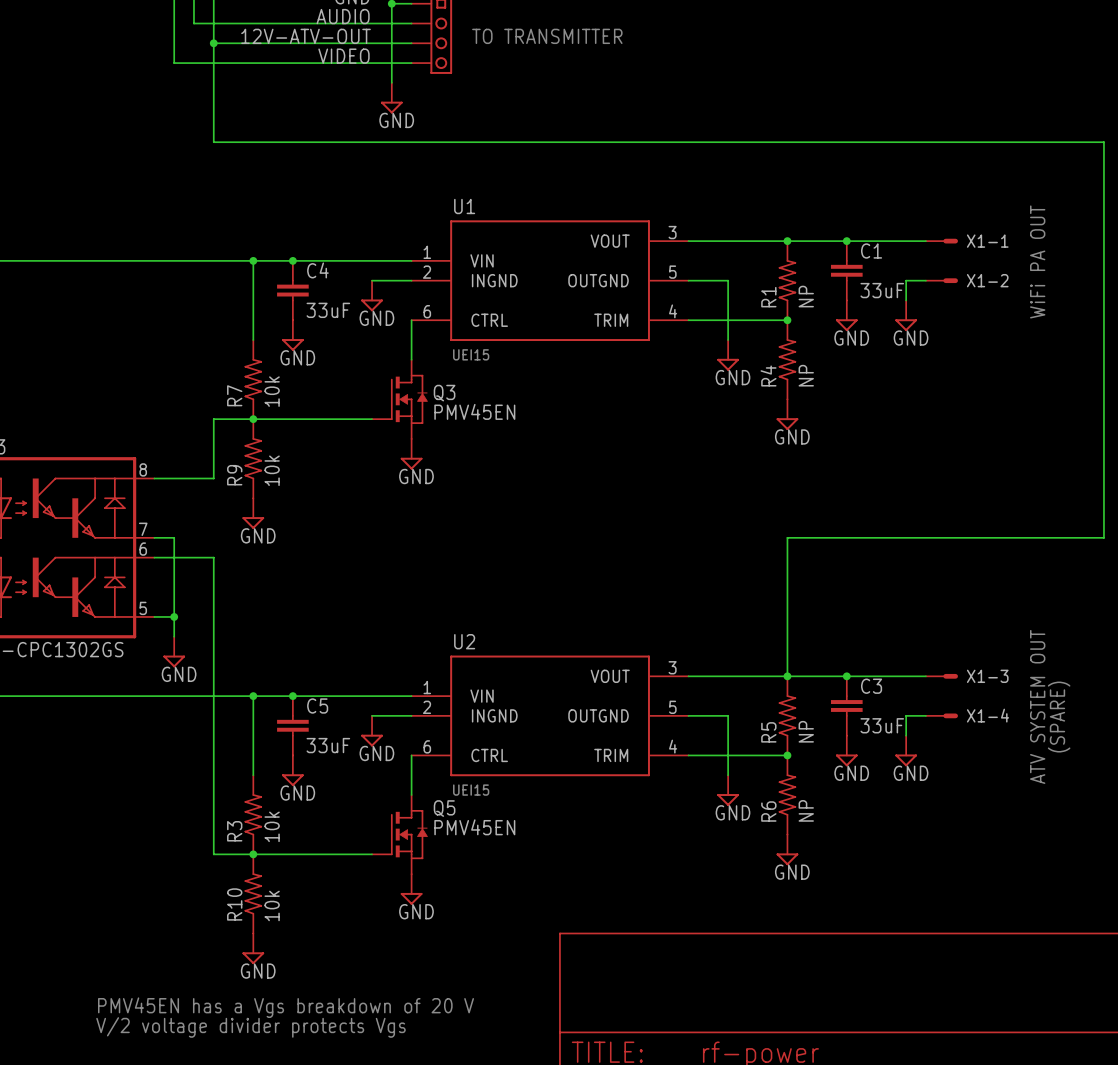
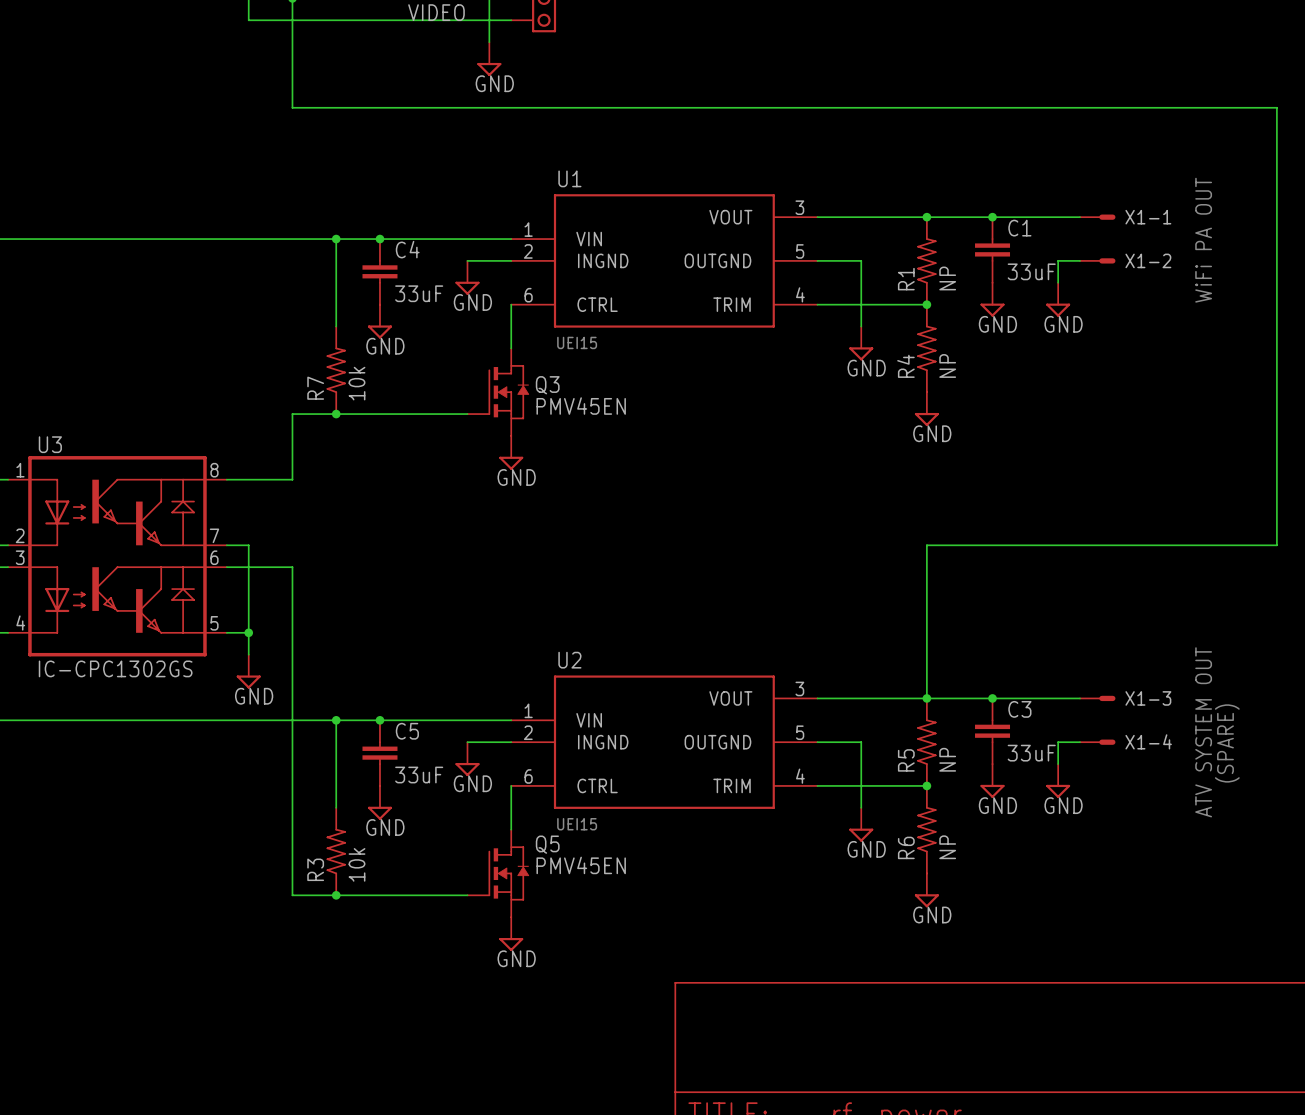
R9: 10k (253, 458) -> none
power symbol: GND (253, 513) -> none
R10: 10k (253, 893) -> none
power symbol: GND (253, 948) -> none
text: PMV45EN has a Vgs breakdown of 20 V (286, 1007) -> none
text: V/2 voltage divider protects Vgs (250, 1027) -> none

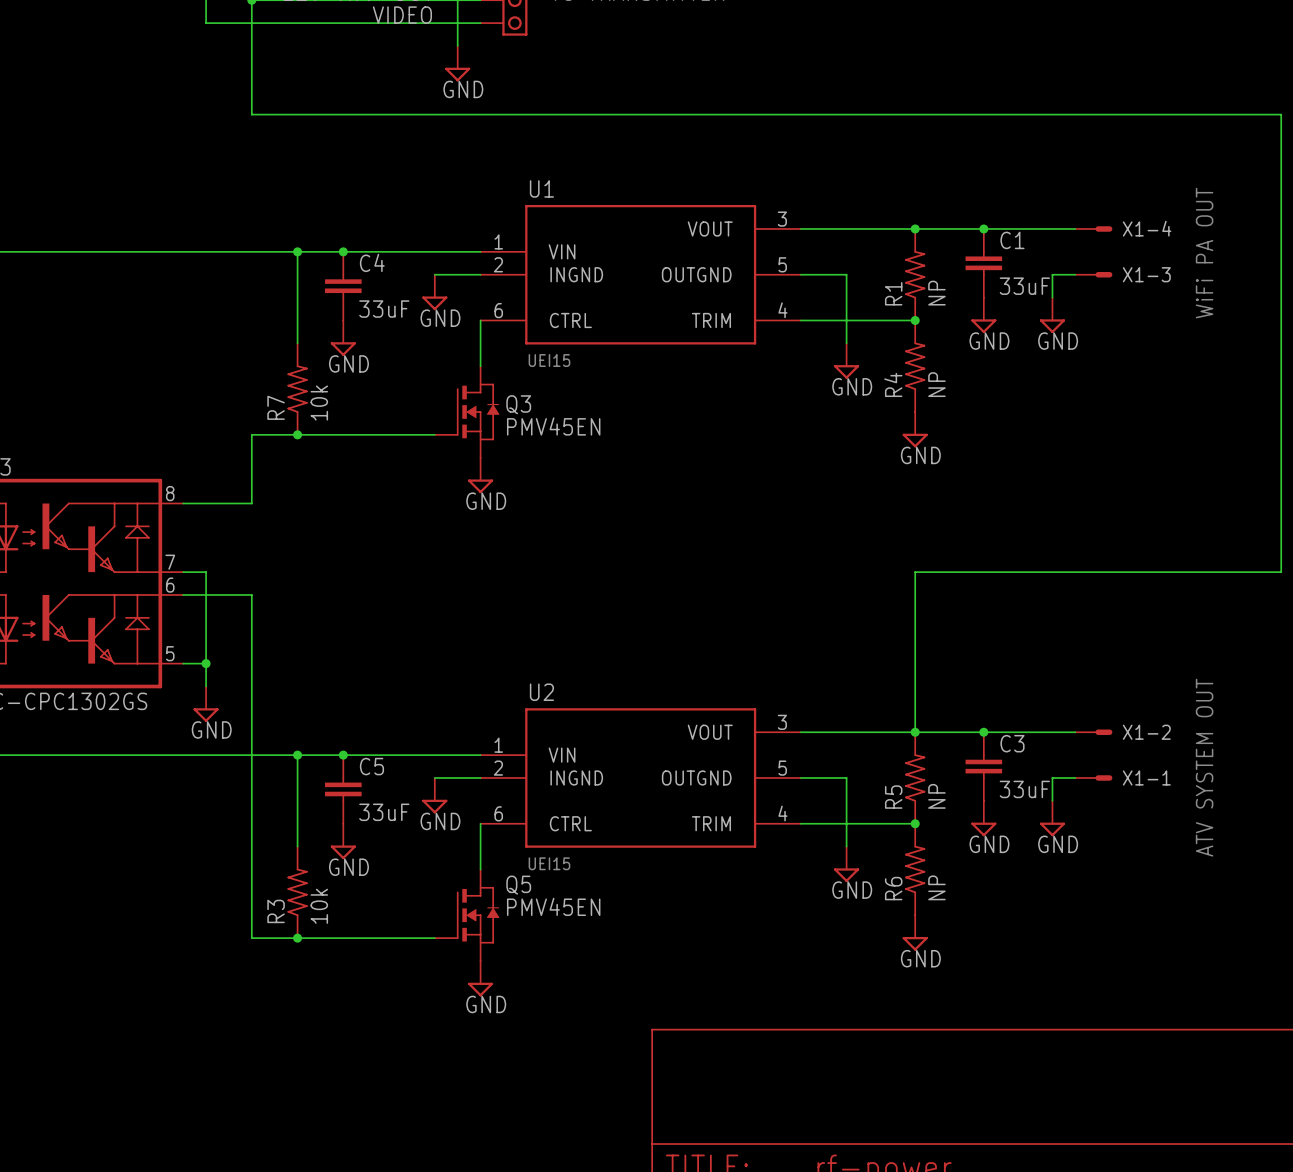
X1-1 name: X1-1 (1148, 217) -> X1-4 (1147, 228)
X1-2 name: X1-2 (1148, 260) -> X1-3 (1146, 274)
X1-3 name: X1-3 (1148, 698) -> X1-2 (1146, 732)
X1-4 name: X1-4 (1148, 741) -> X1-1 (1146, 777)
text: (SPARE) (1227, 743) -> none

